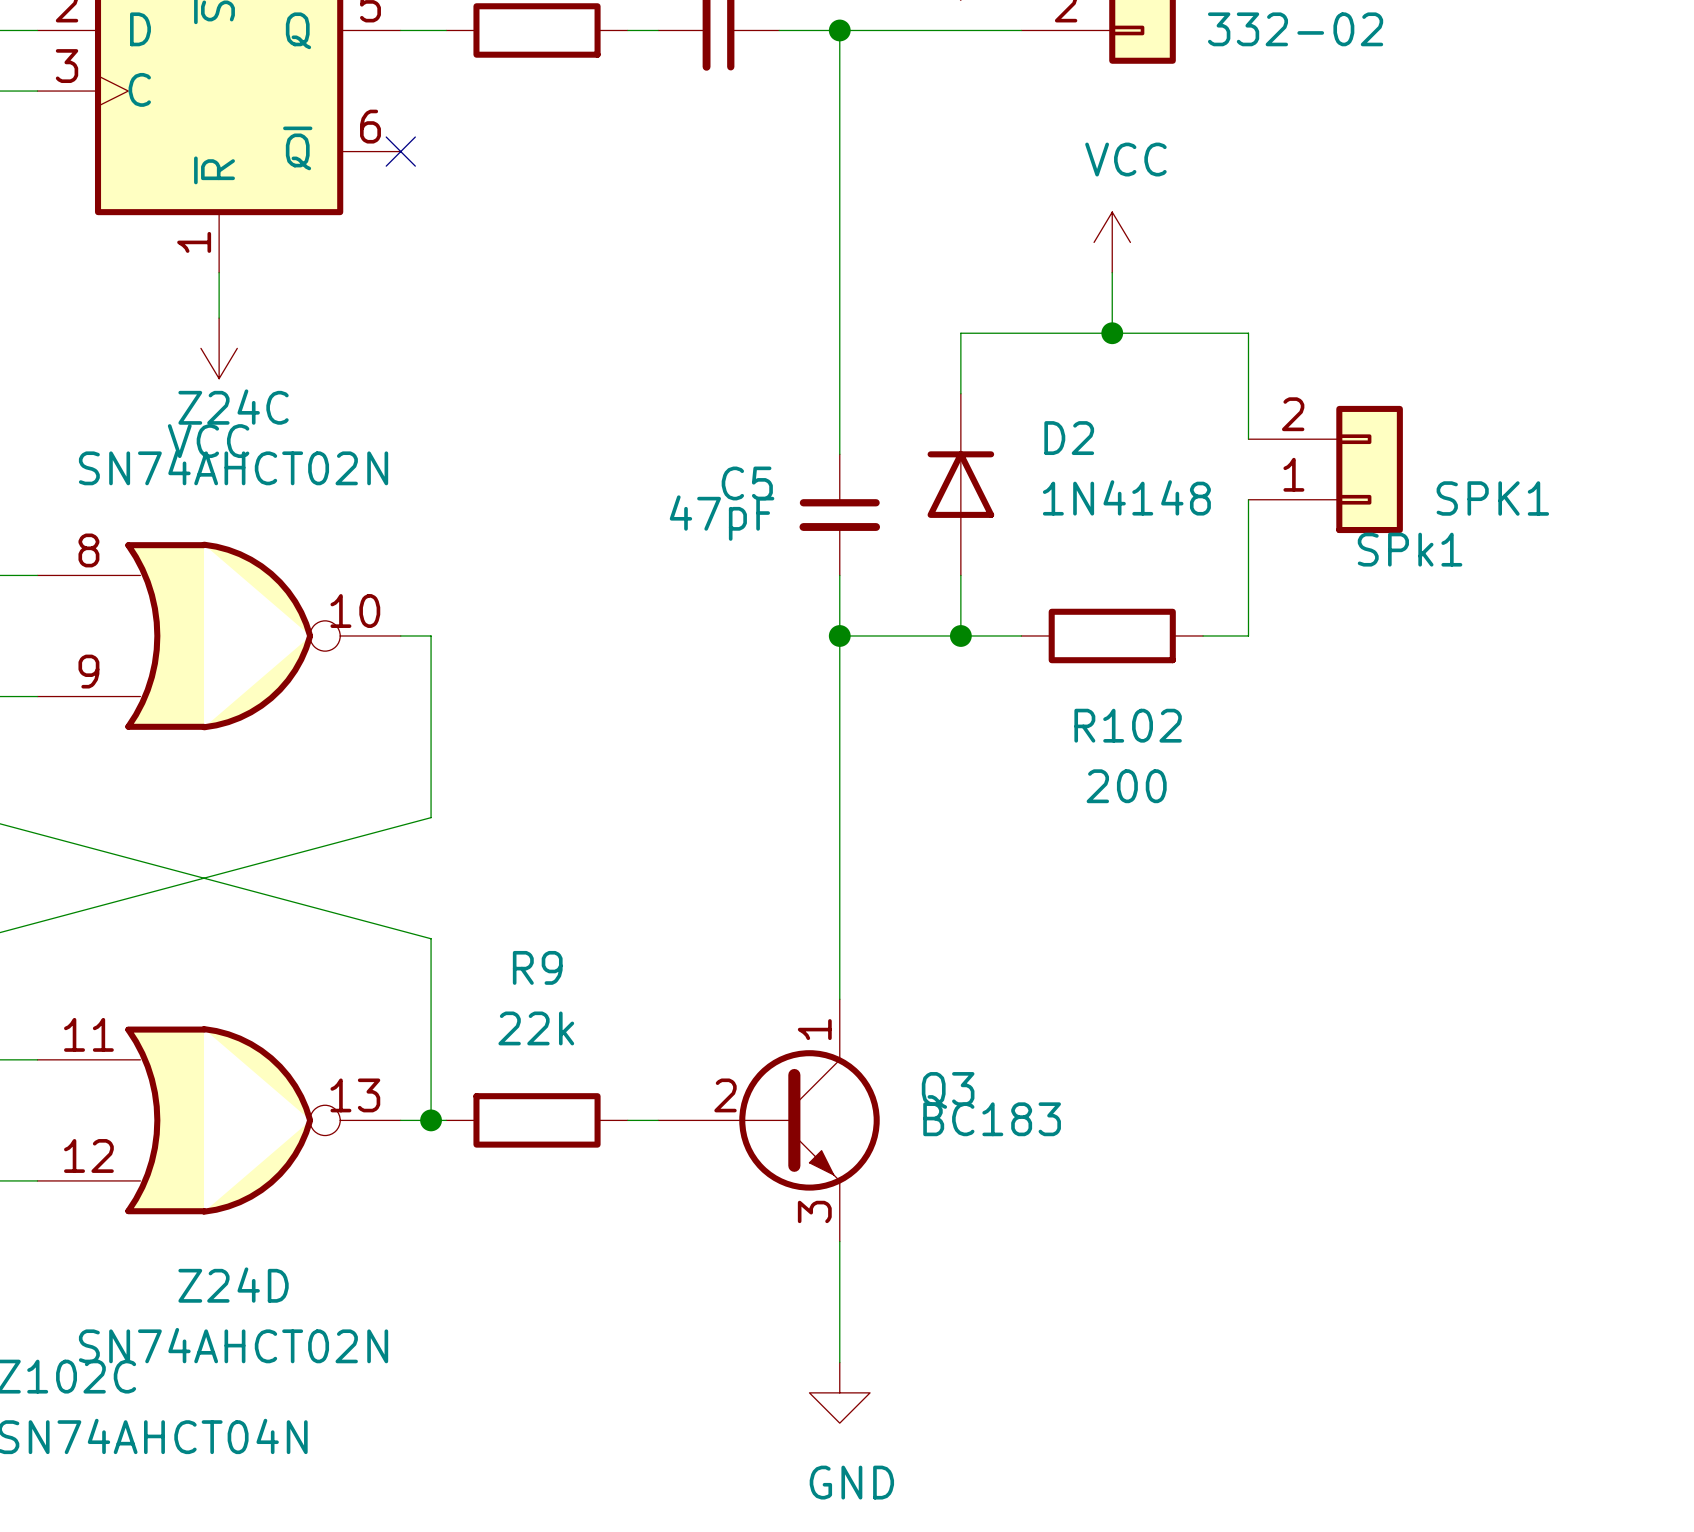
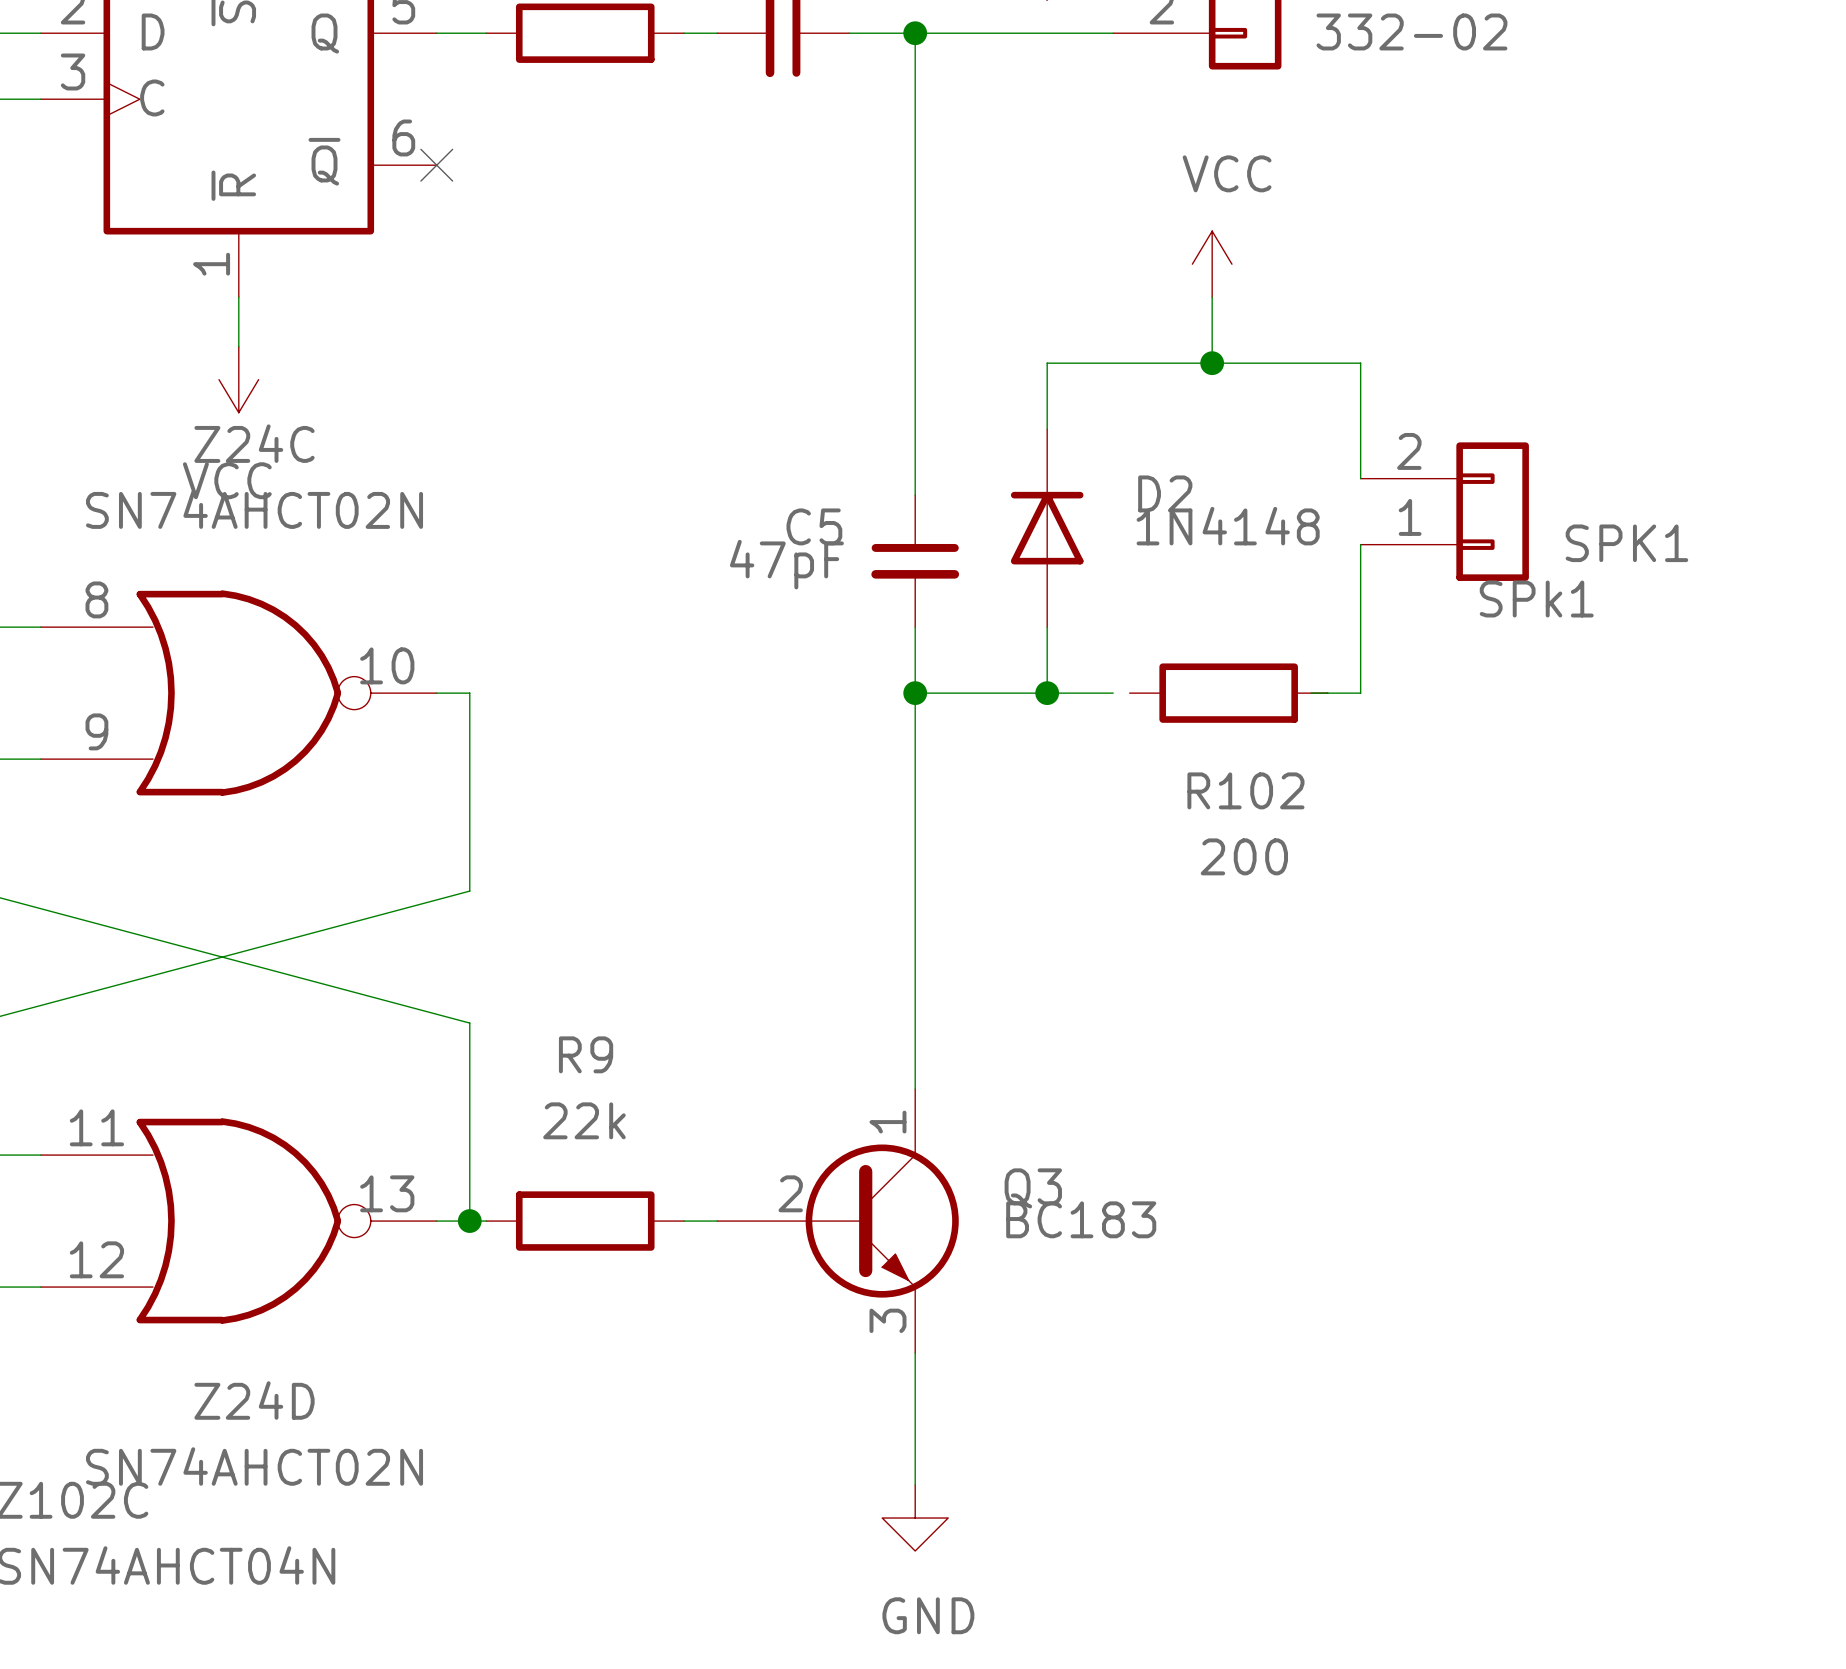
D2 name position: D2 (1069, 438) -> D2 (1165, 493)
D2 value position: 1N4148 (1126, 497) -> 1N4148 (1228, 526)
R102 position: (1112, 635) -> (1228, 693)

